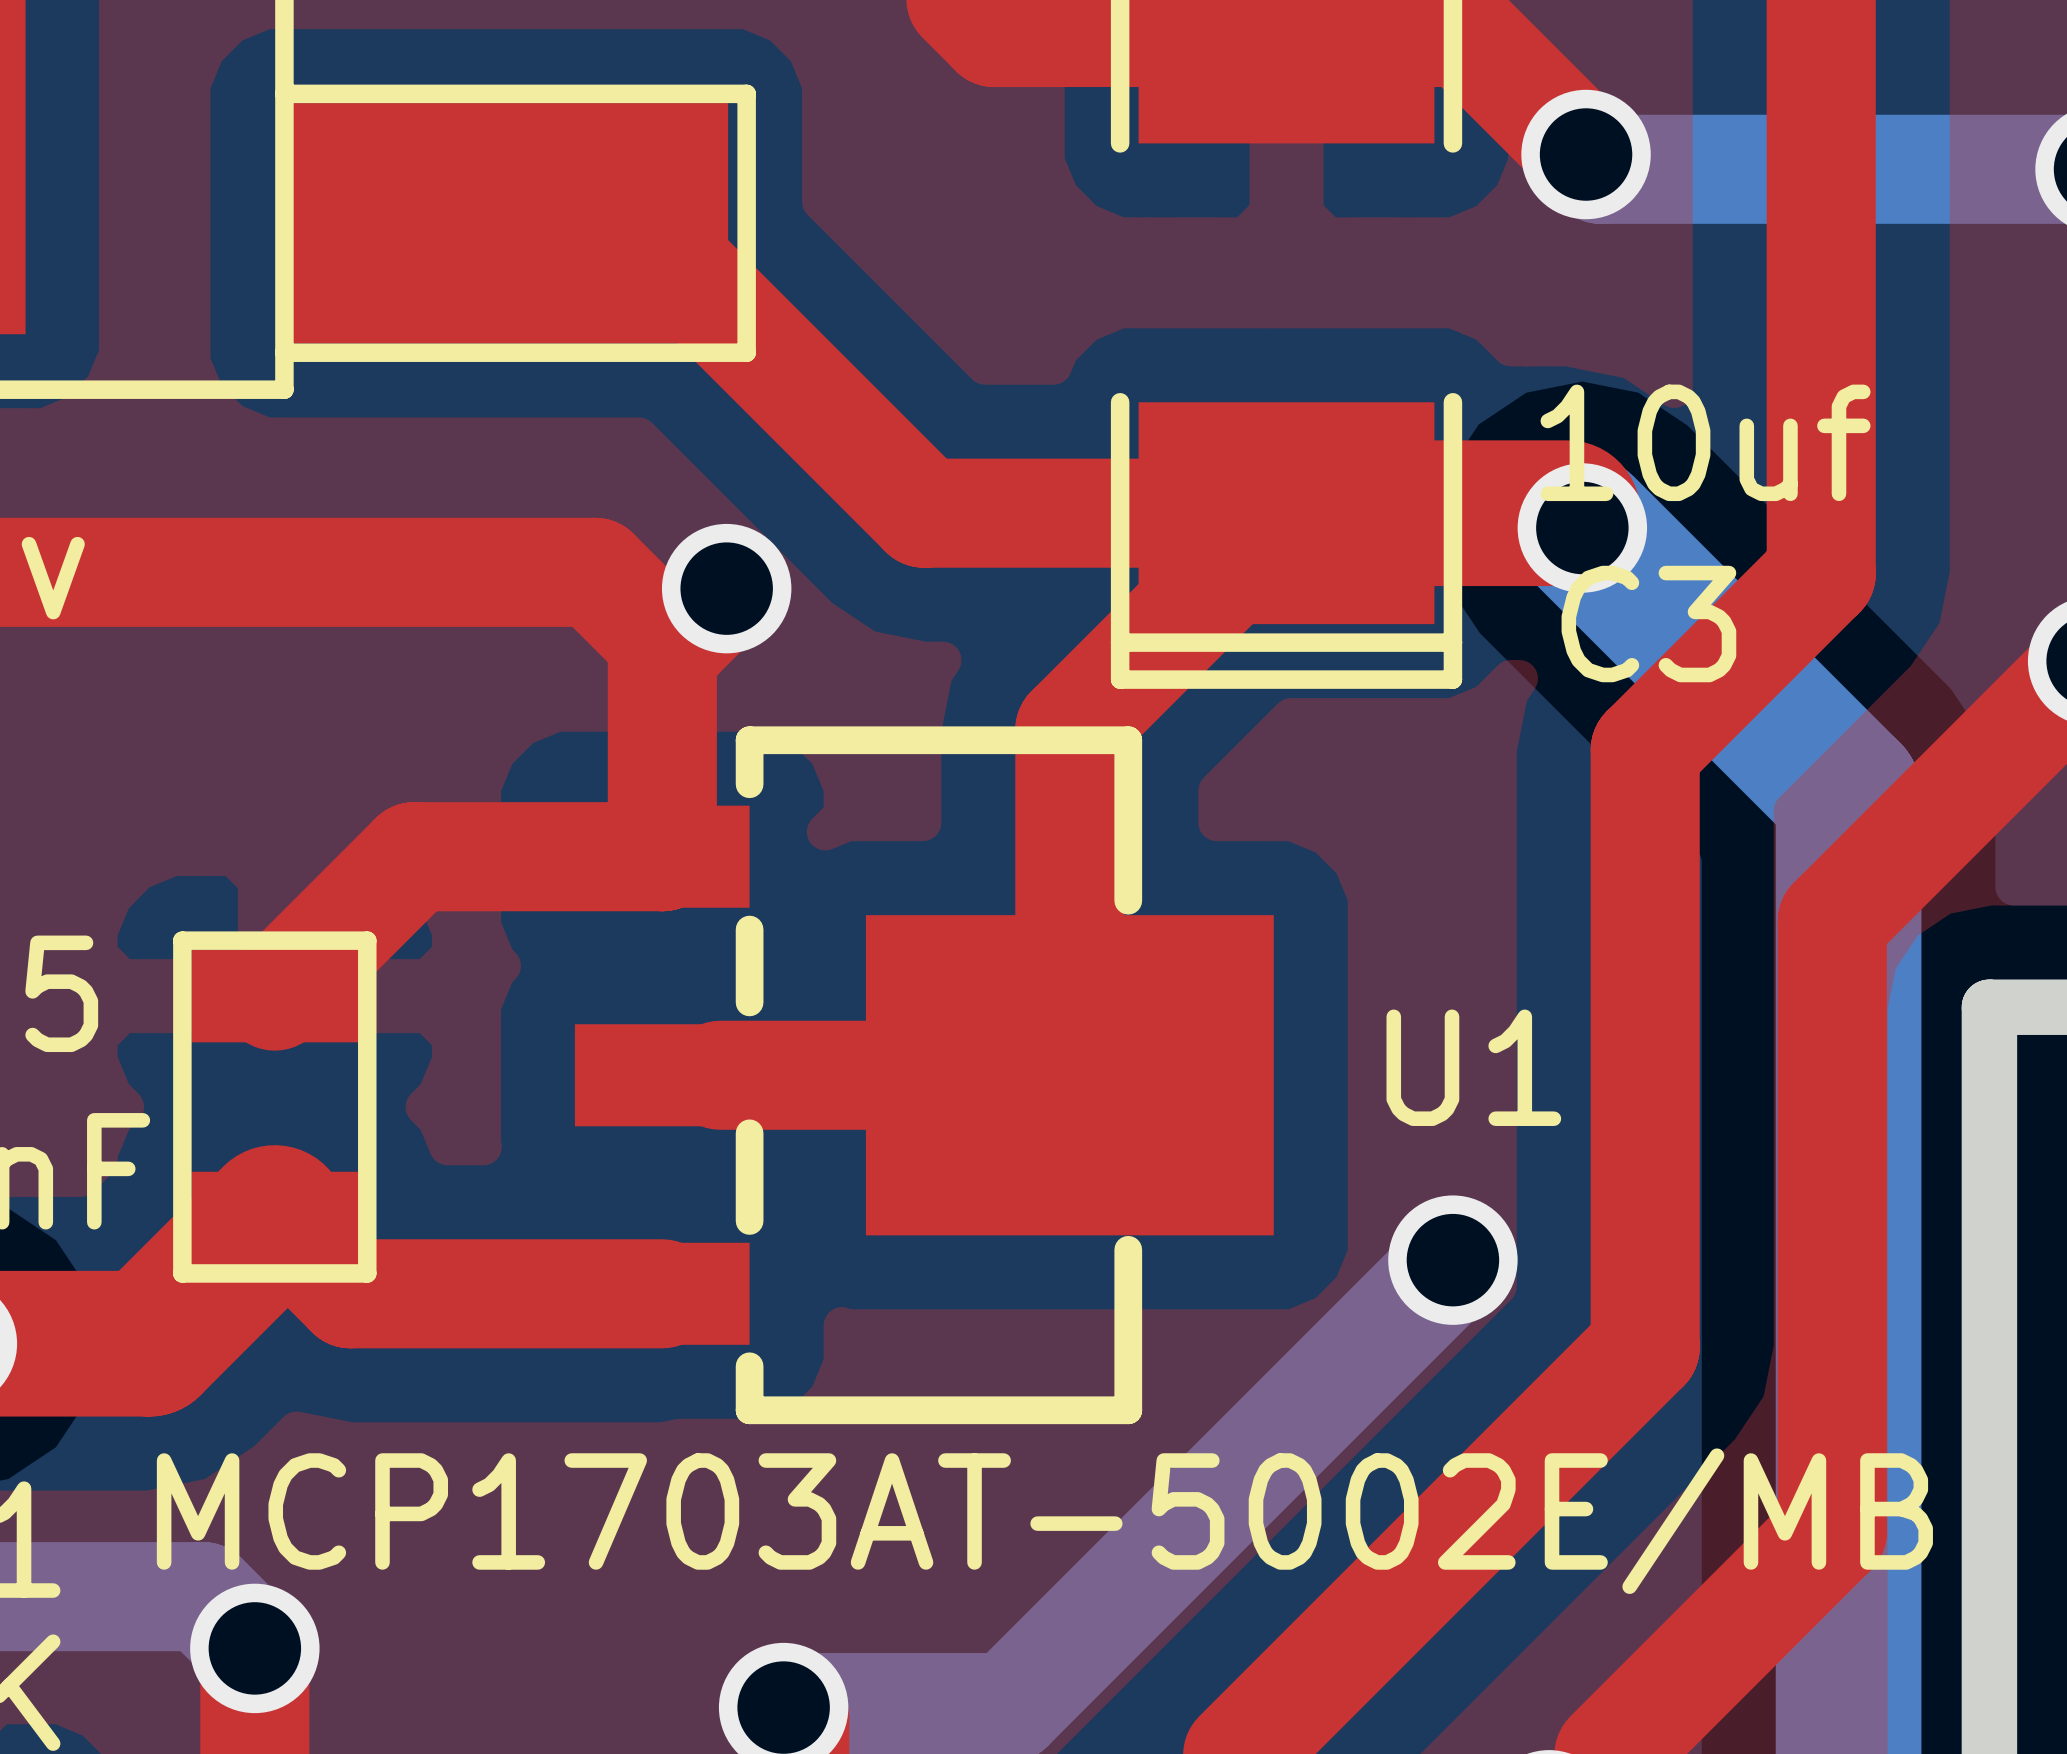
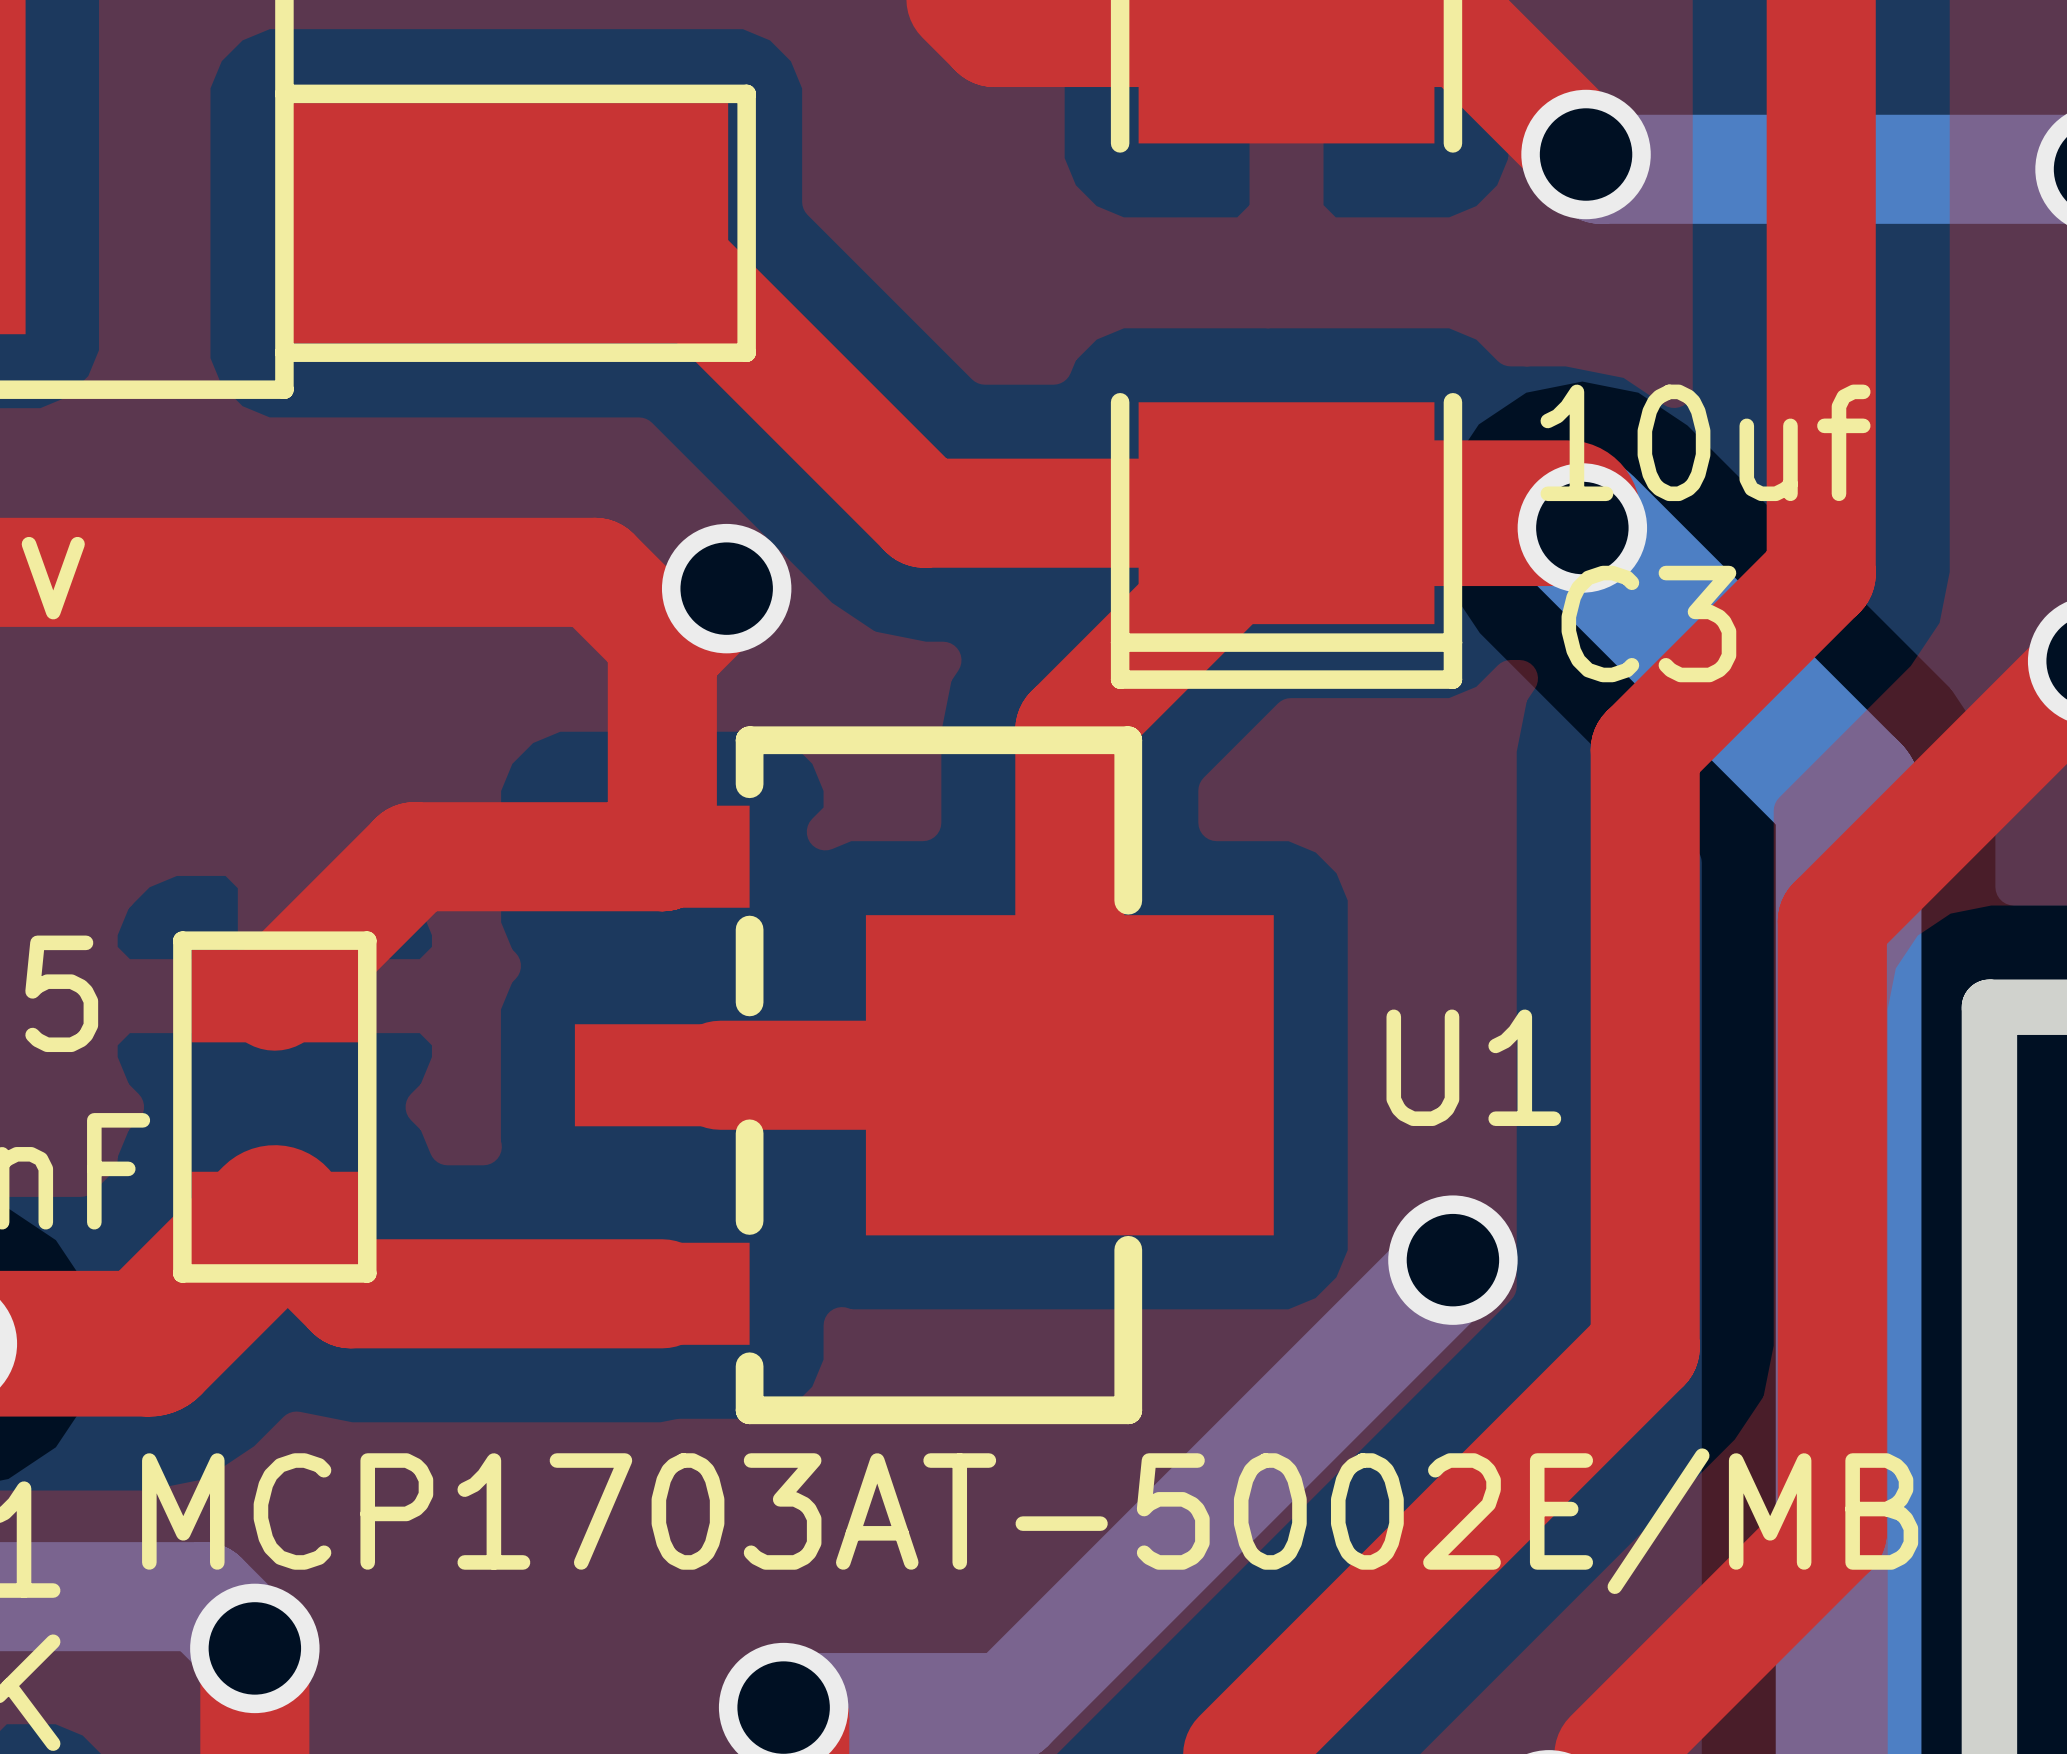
U1 value position: MCP1703AT-5002E/MB (1044, 1521) -> MCP1703AT-5002E/MB (1030, 1521)

